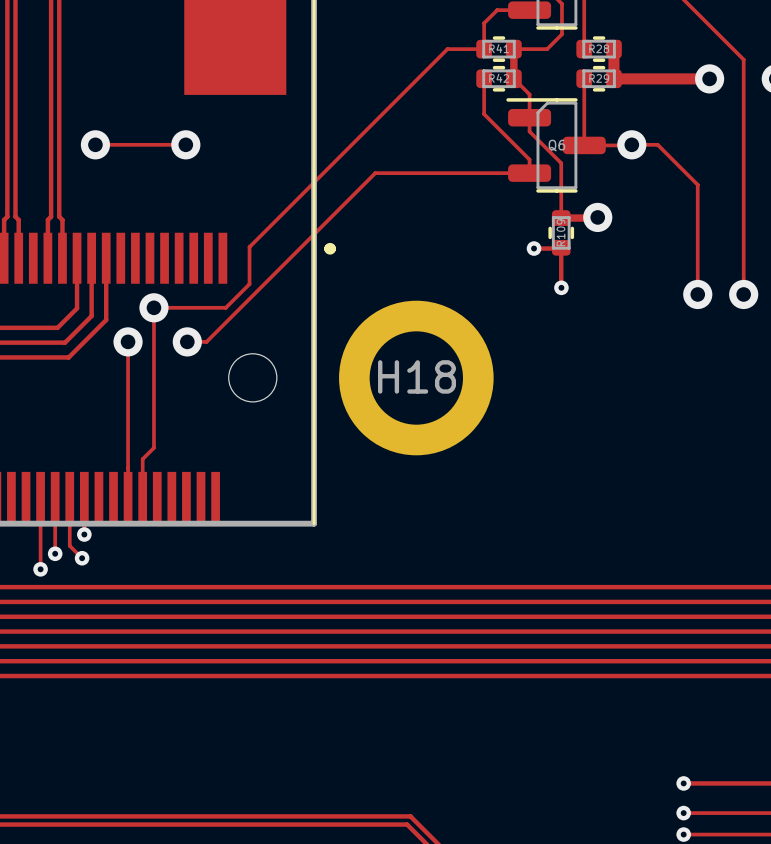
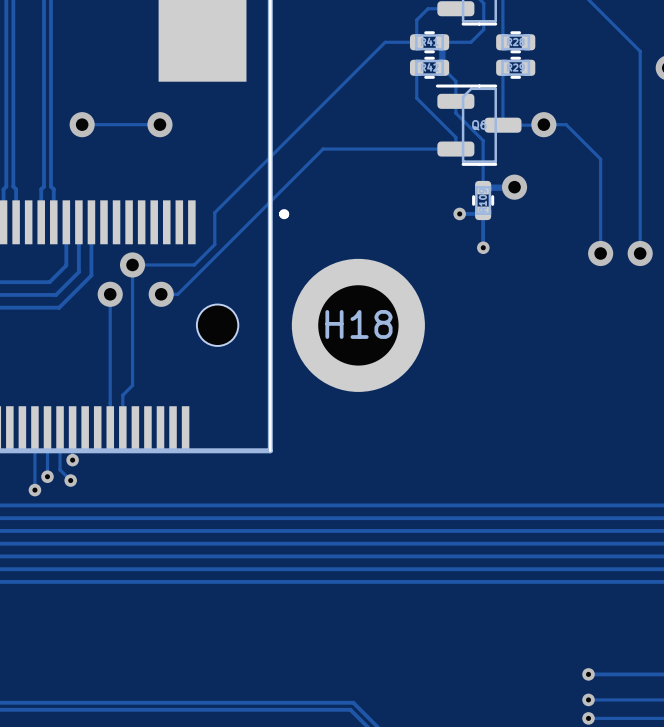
track: (613, 49) (613, 78) (709, 78) -> none
via: (709, 78) -> none

